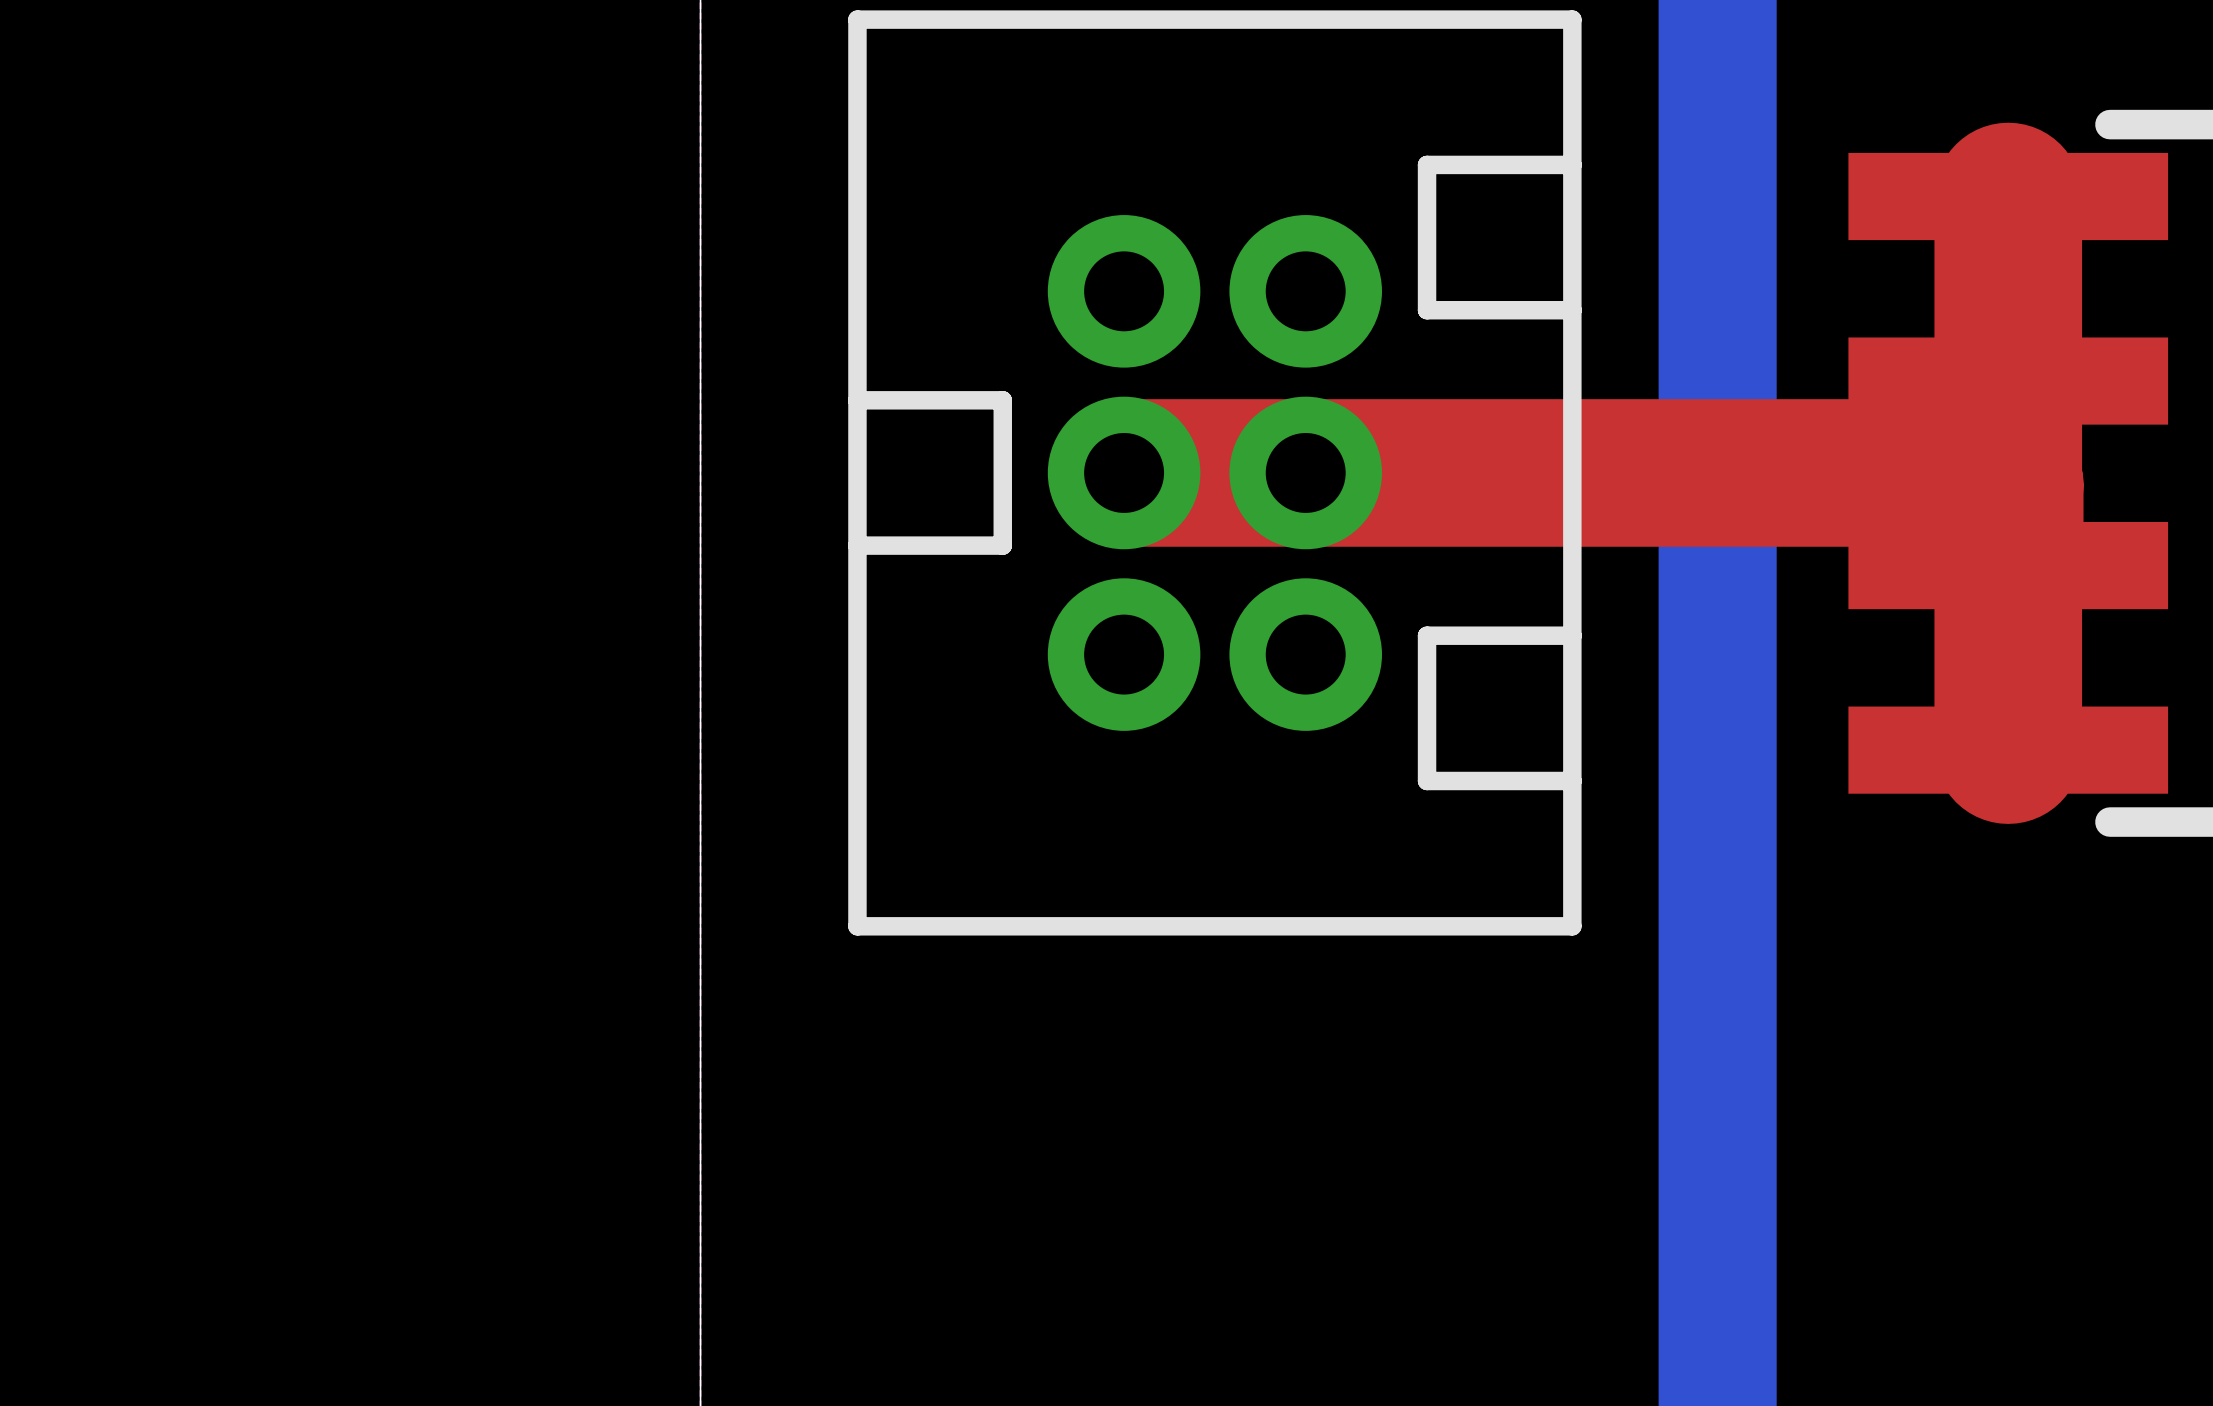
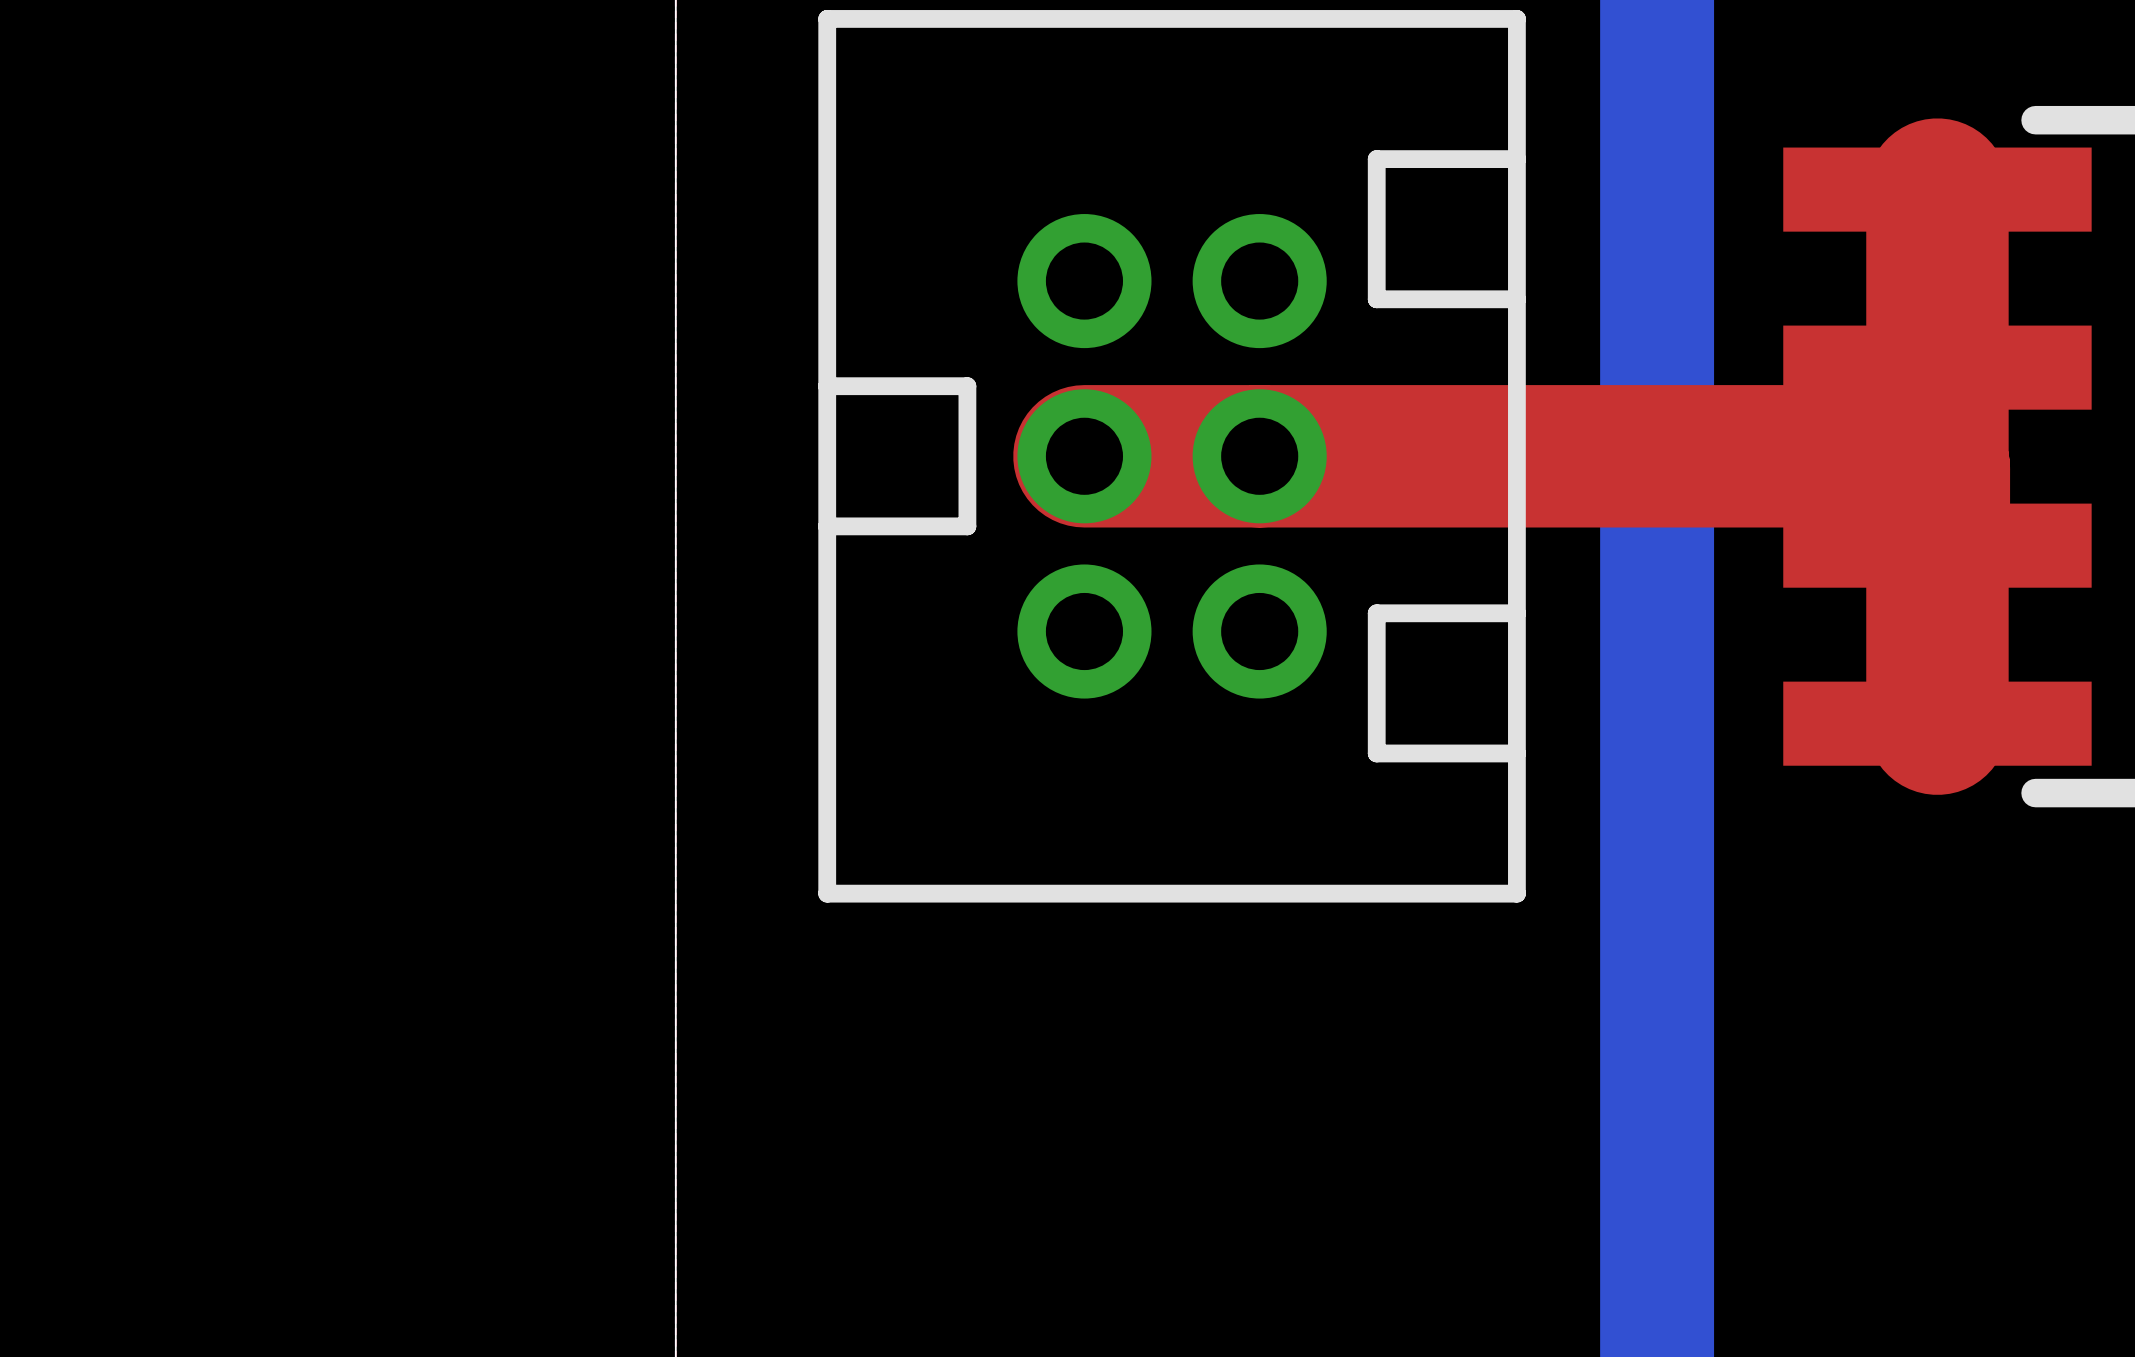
part footprint: [848, 10, 1582, 936] -> [818, 10, 1526, 903]

